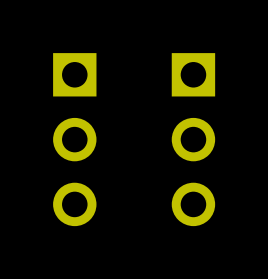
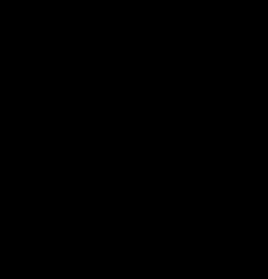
part: (74, 139) -> none
part: (193, 139) -> none

